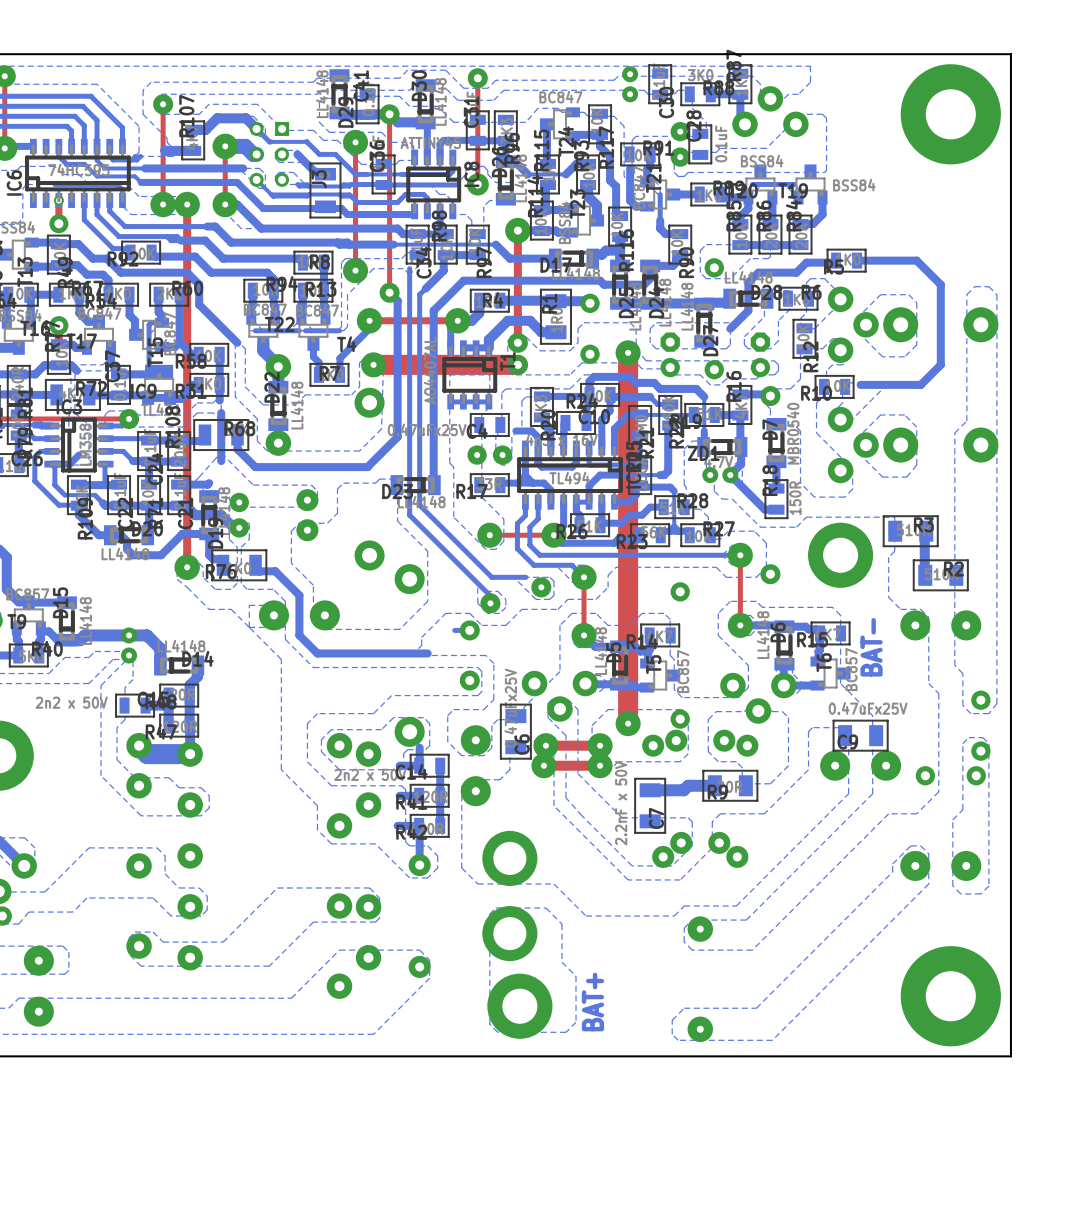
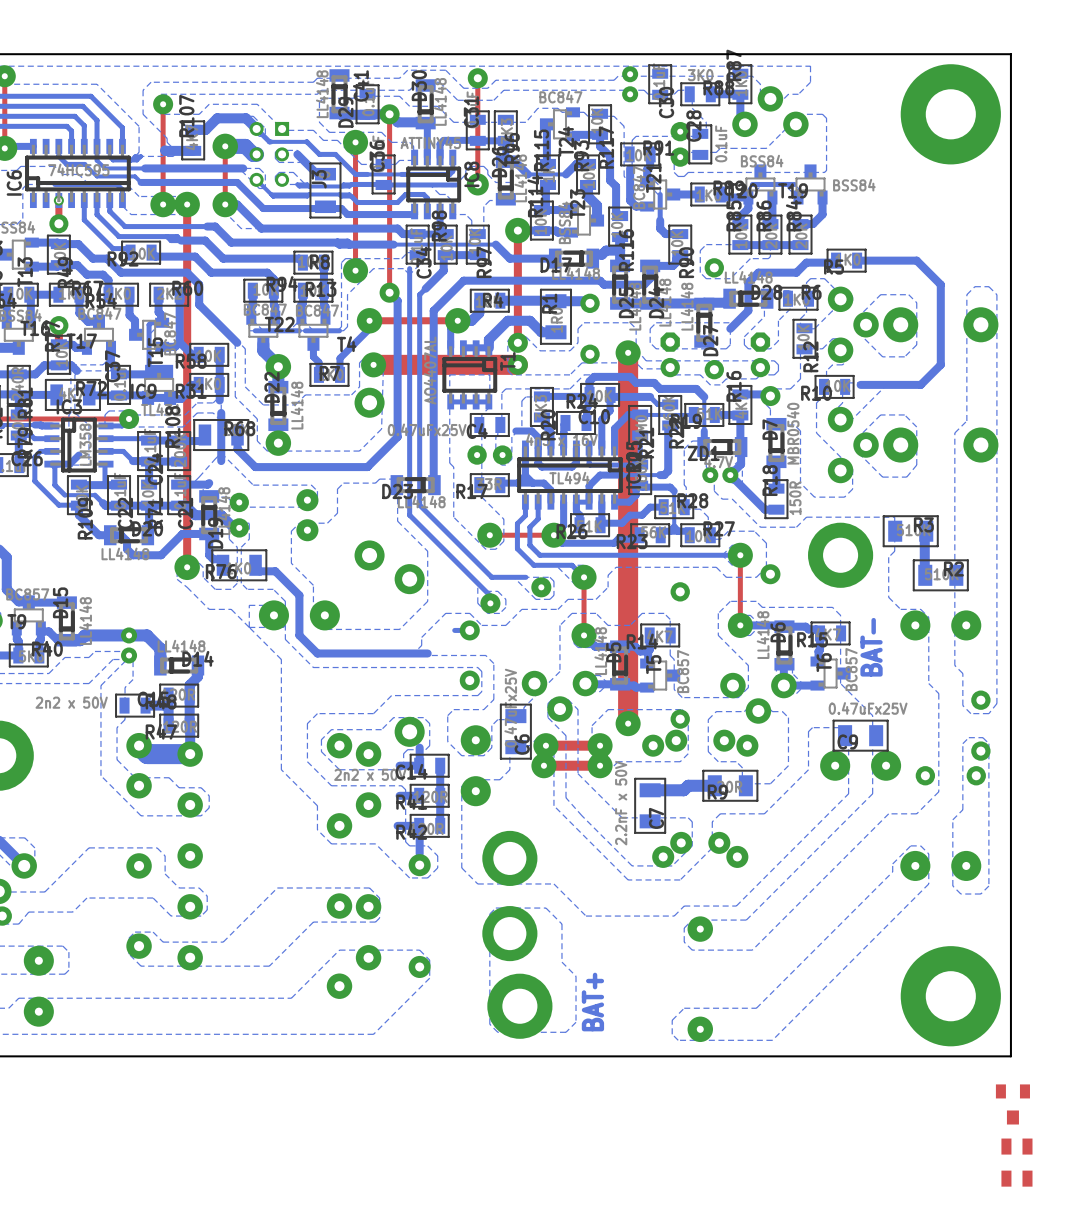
part: none -> (1012, 1104)
part: none -> (1016, 1146)
part: none -> (1016, 1178)

